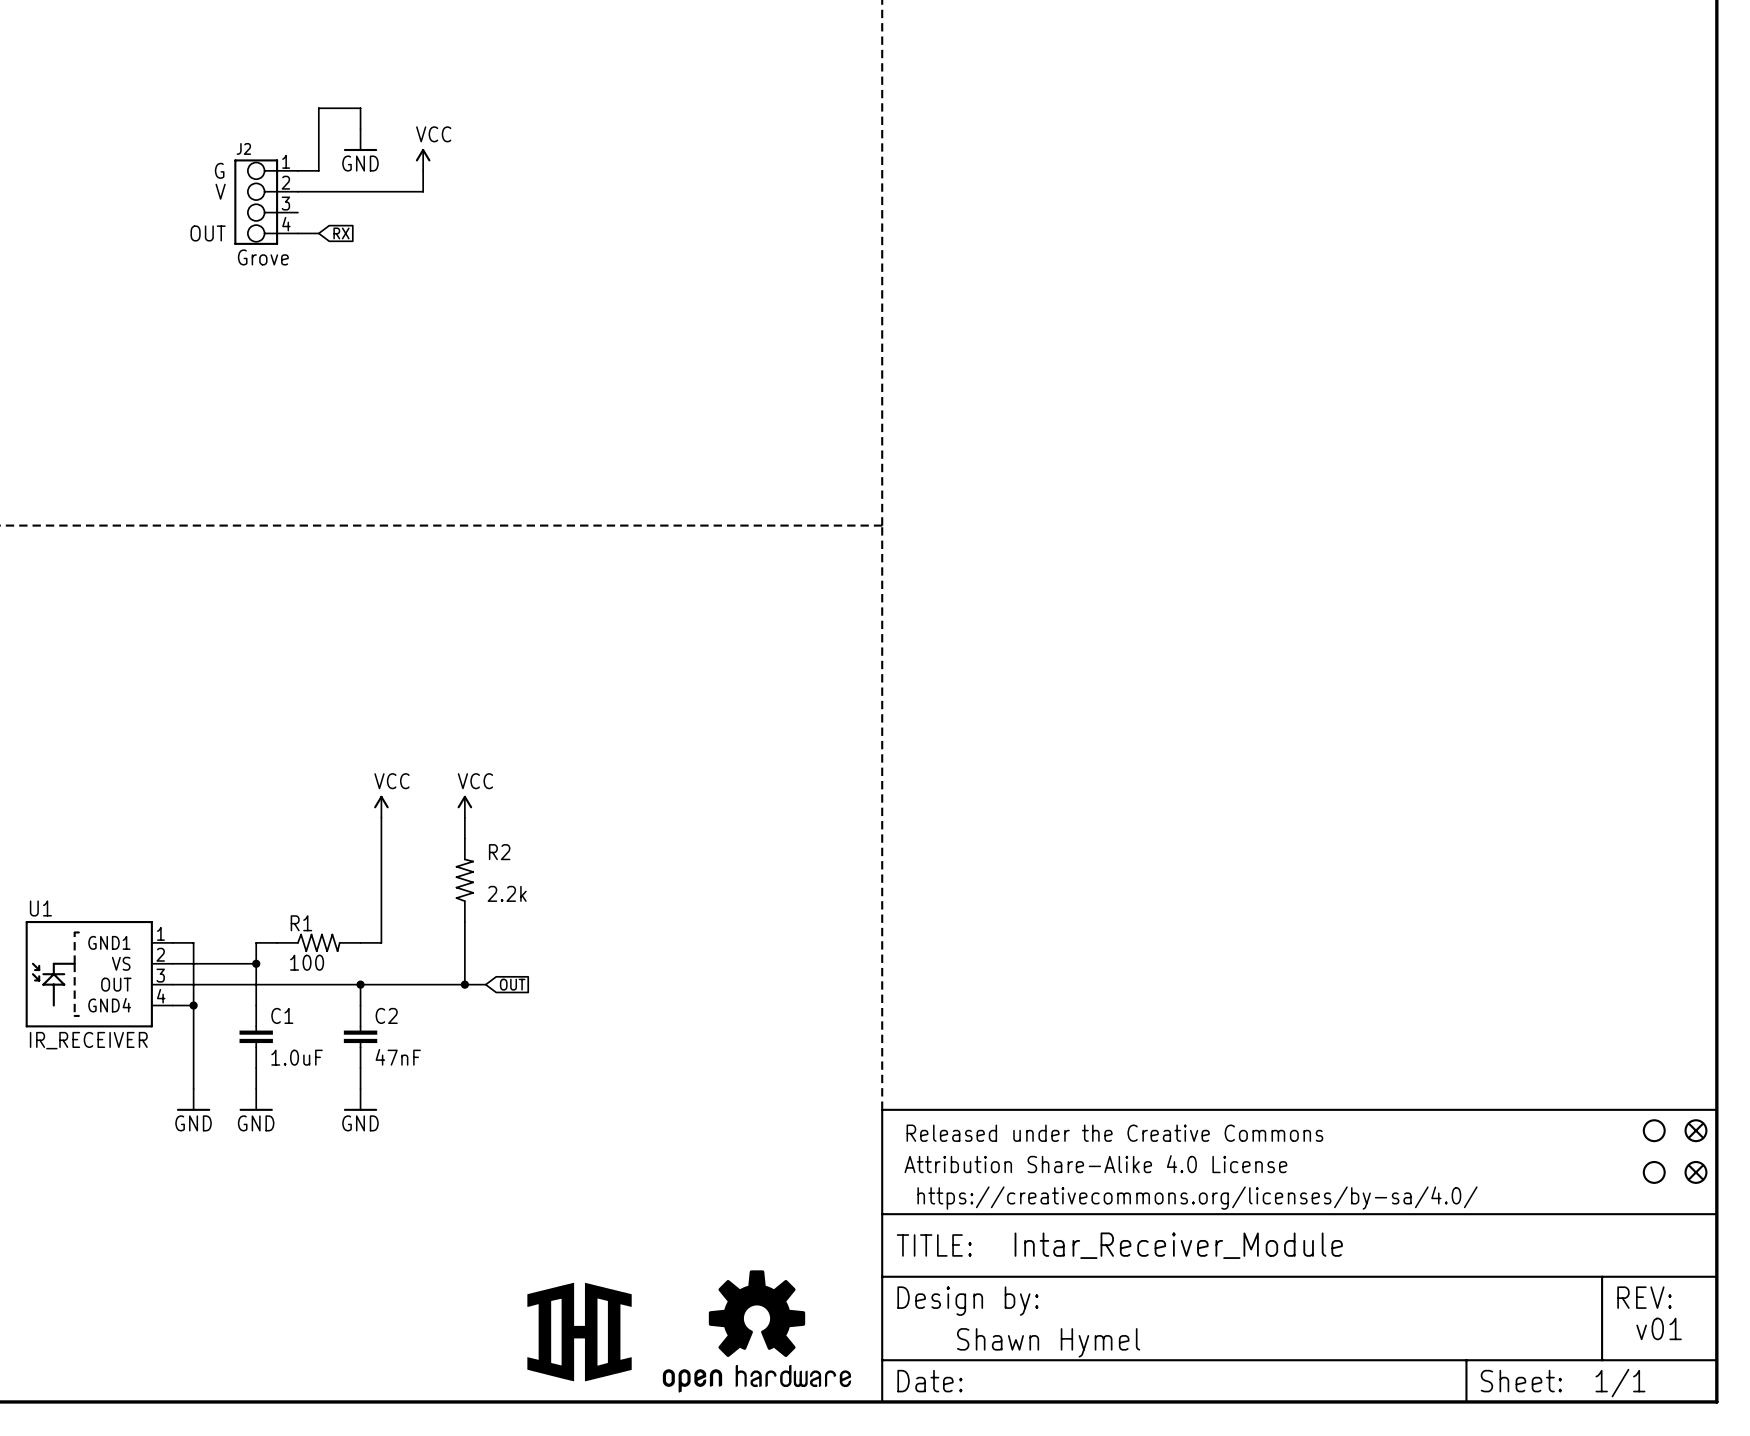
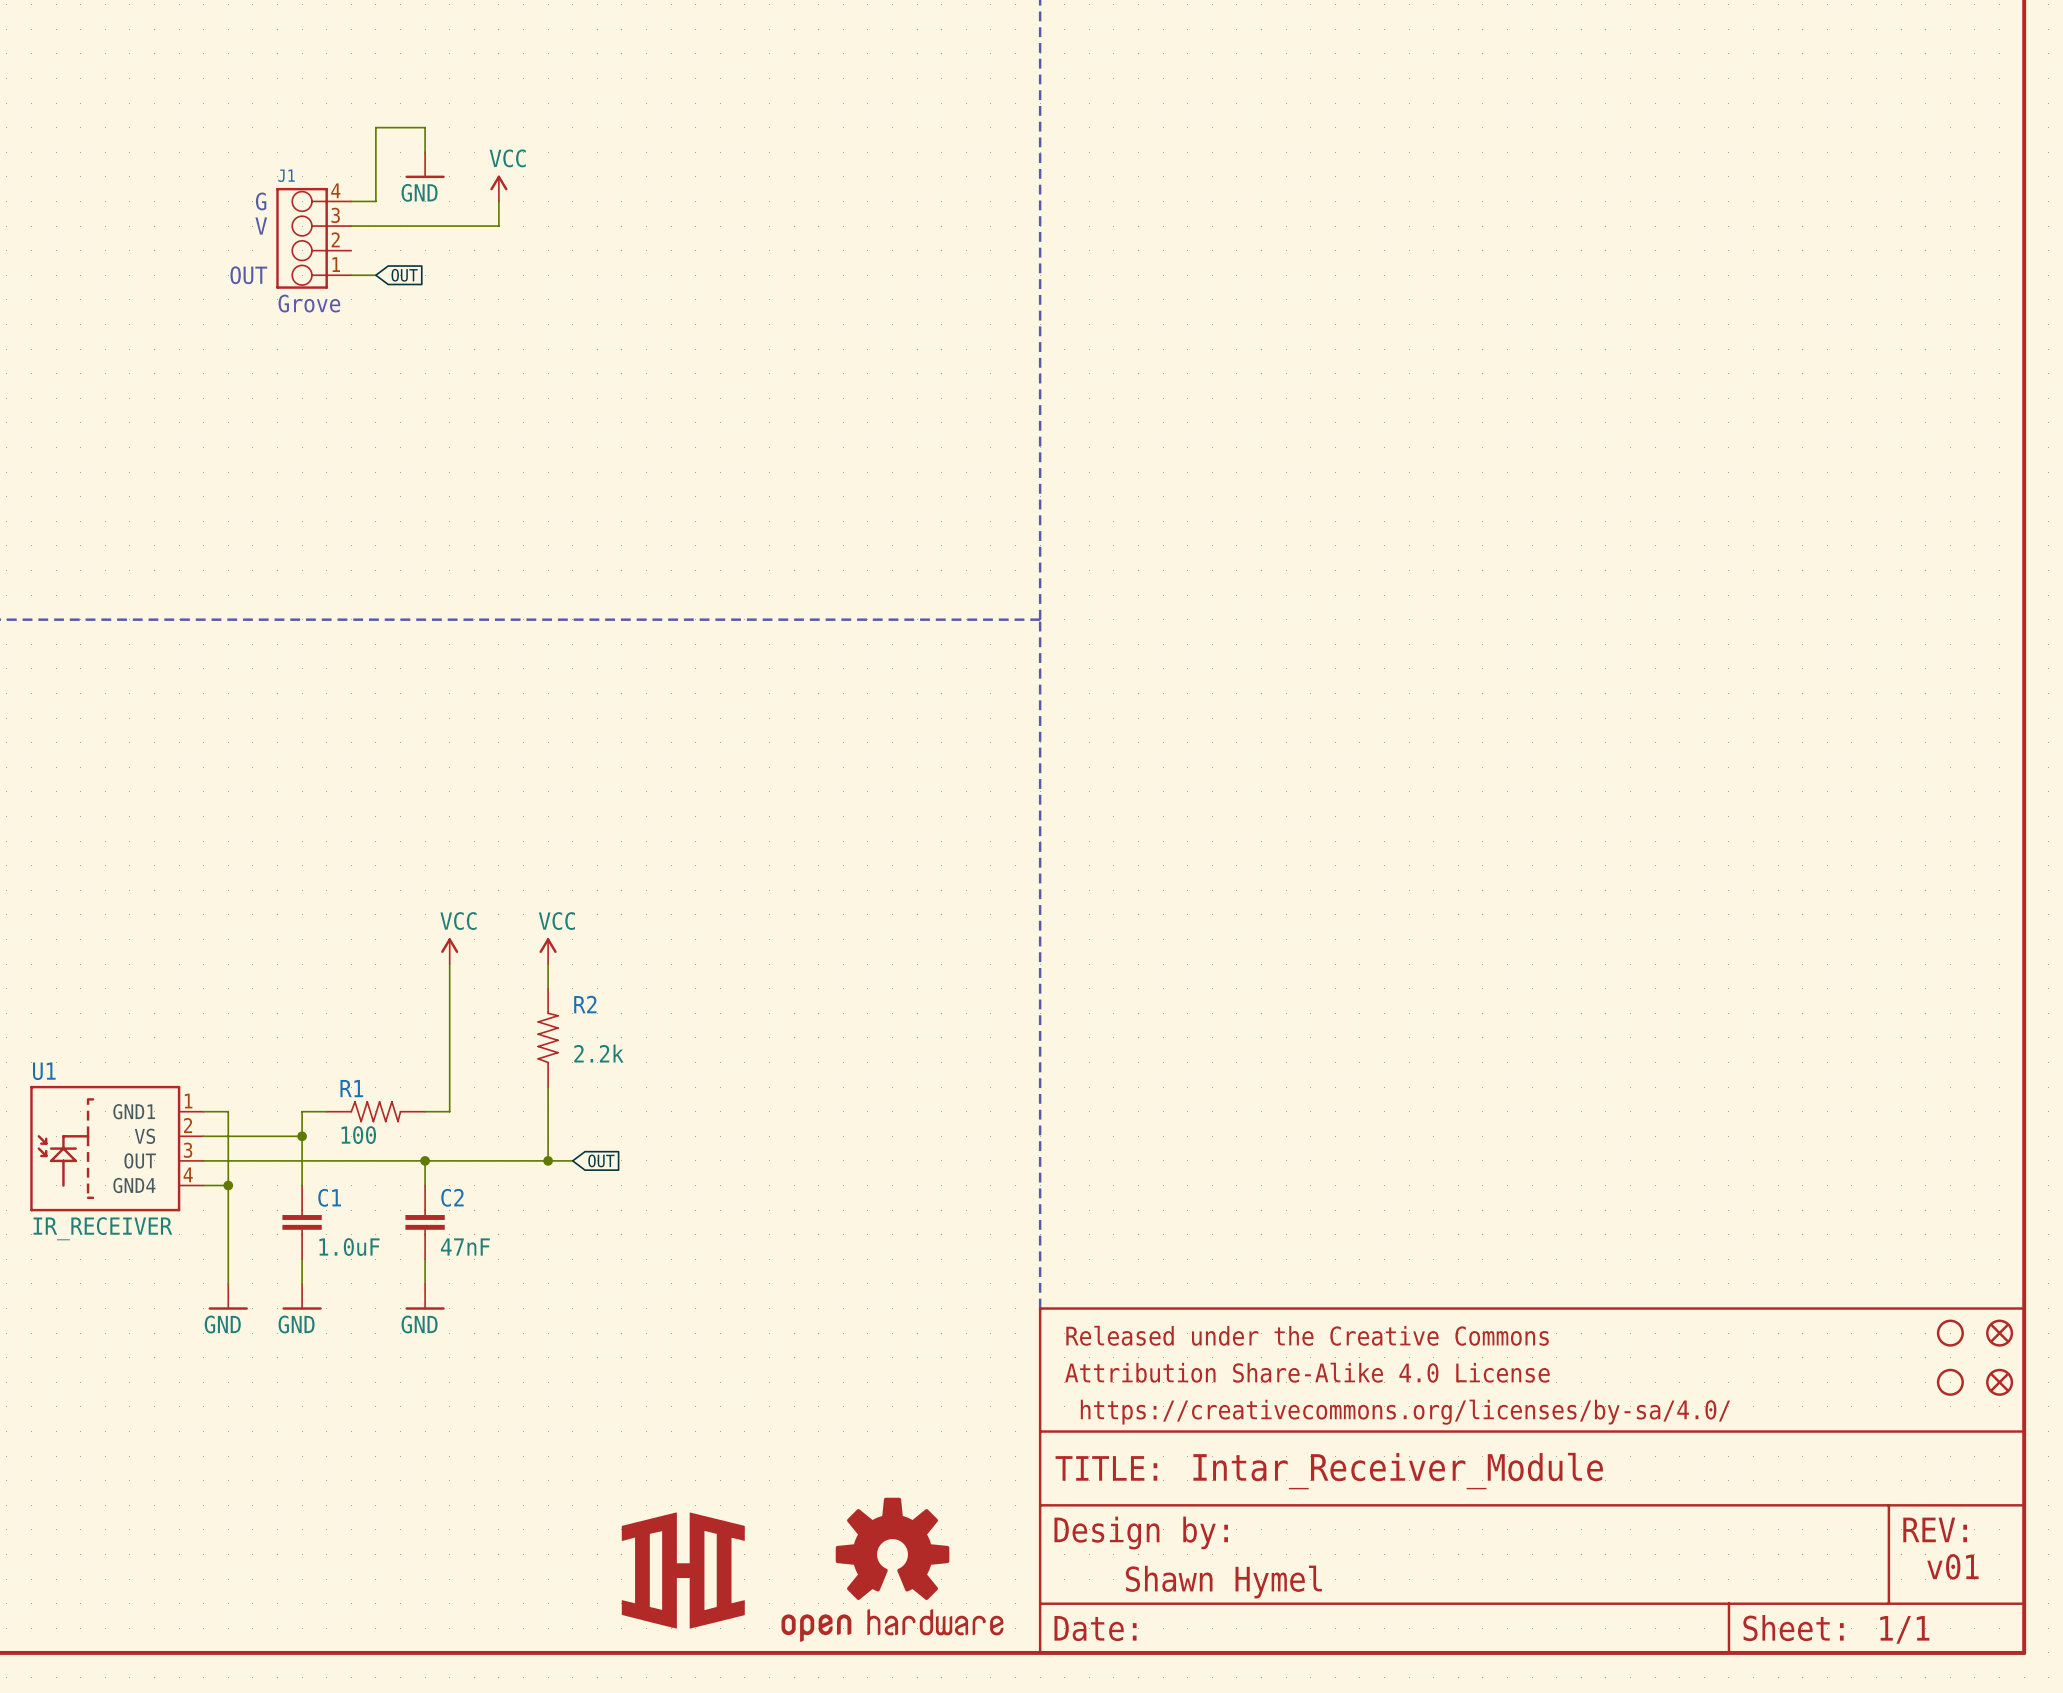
J2 name: J2 (243, 148) -> J1 (286, 175)
J2 flip: as is (256, 202) -> up-down (302, 238)
global label: RX (341, 233) -> OUT (404, 275)

